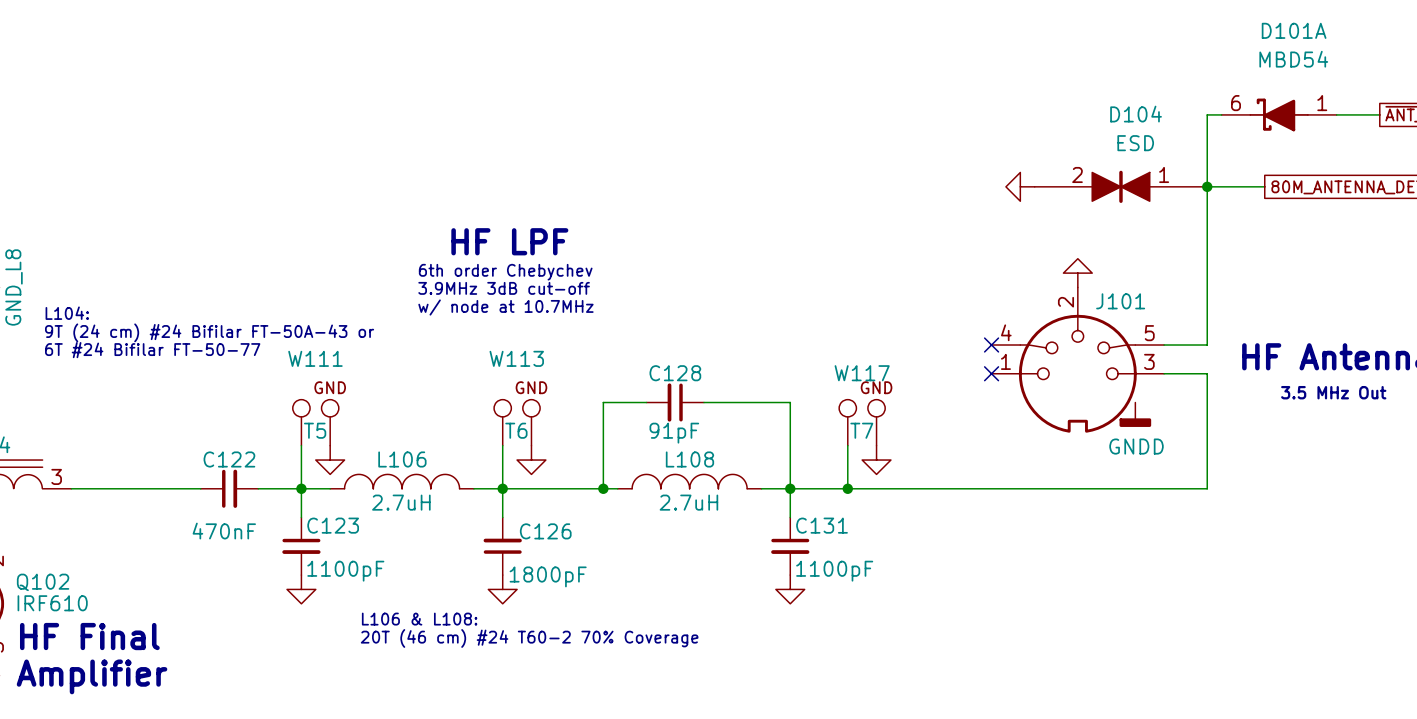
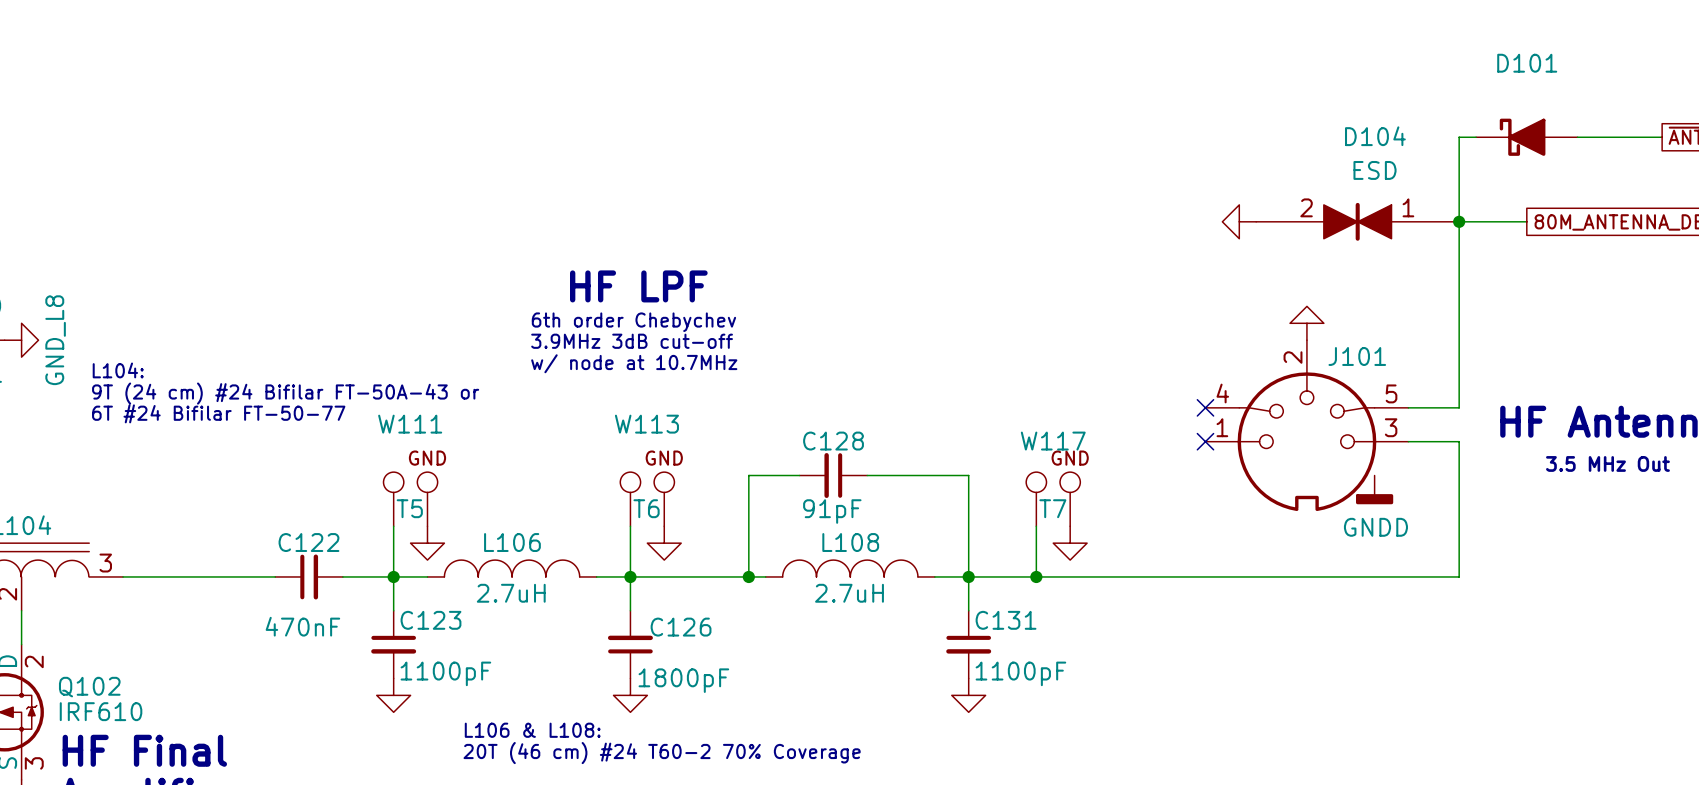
D101: none -> (1526, 137)
D101A: (1279, 114) -> none

